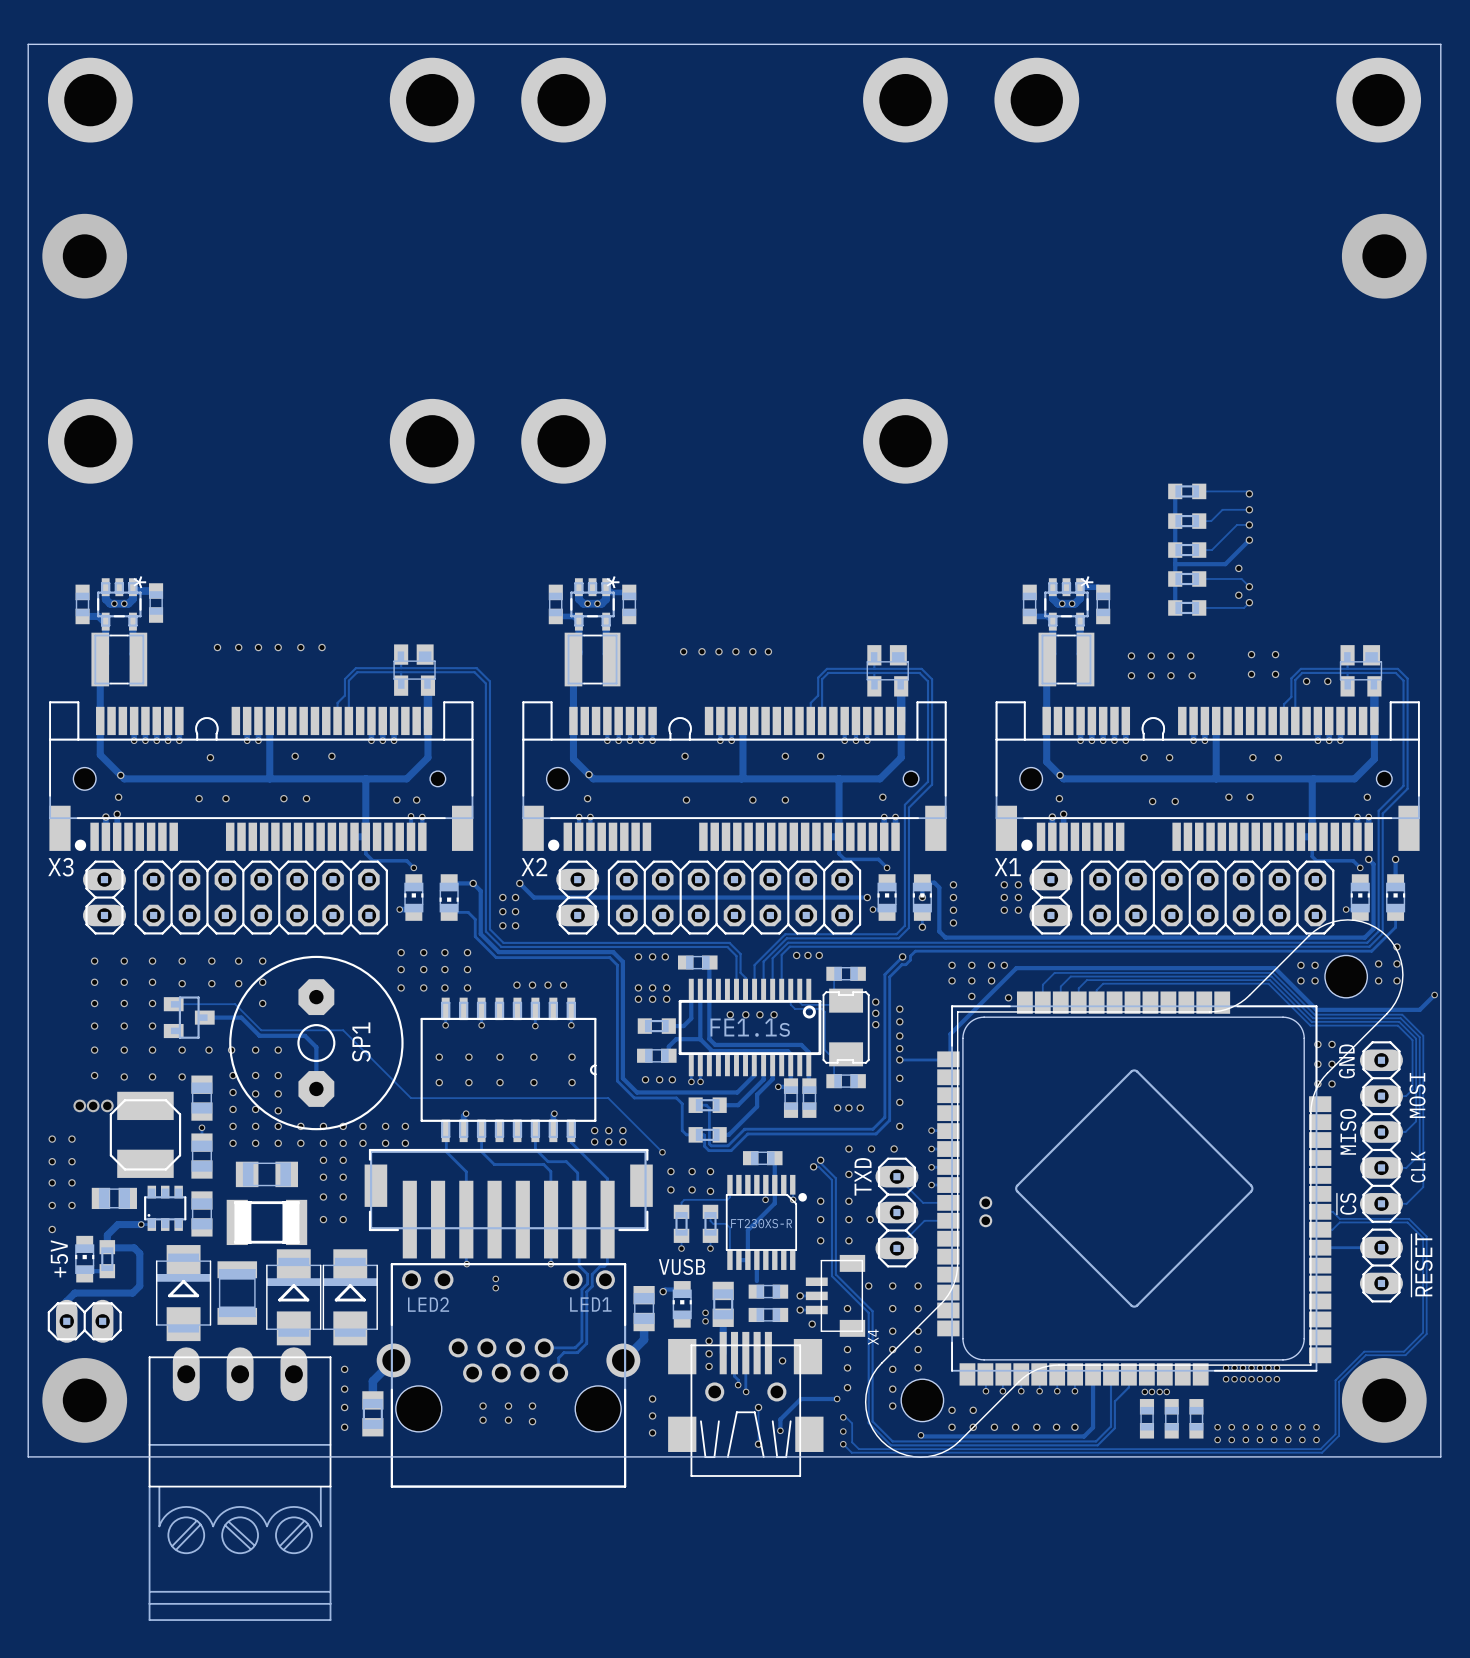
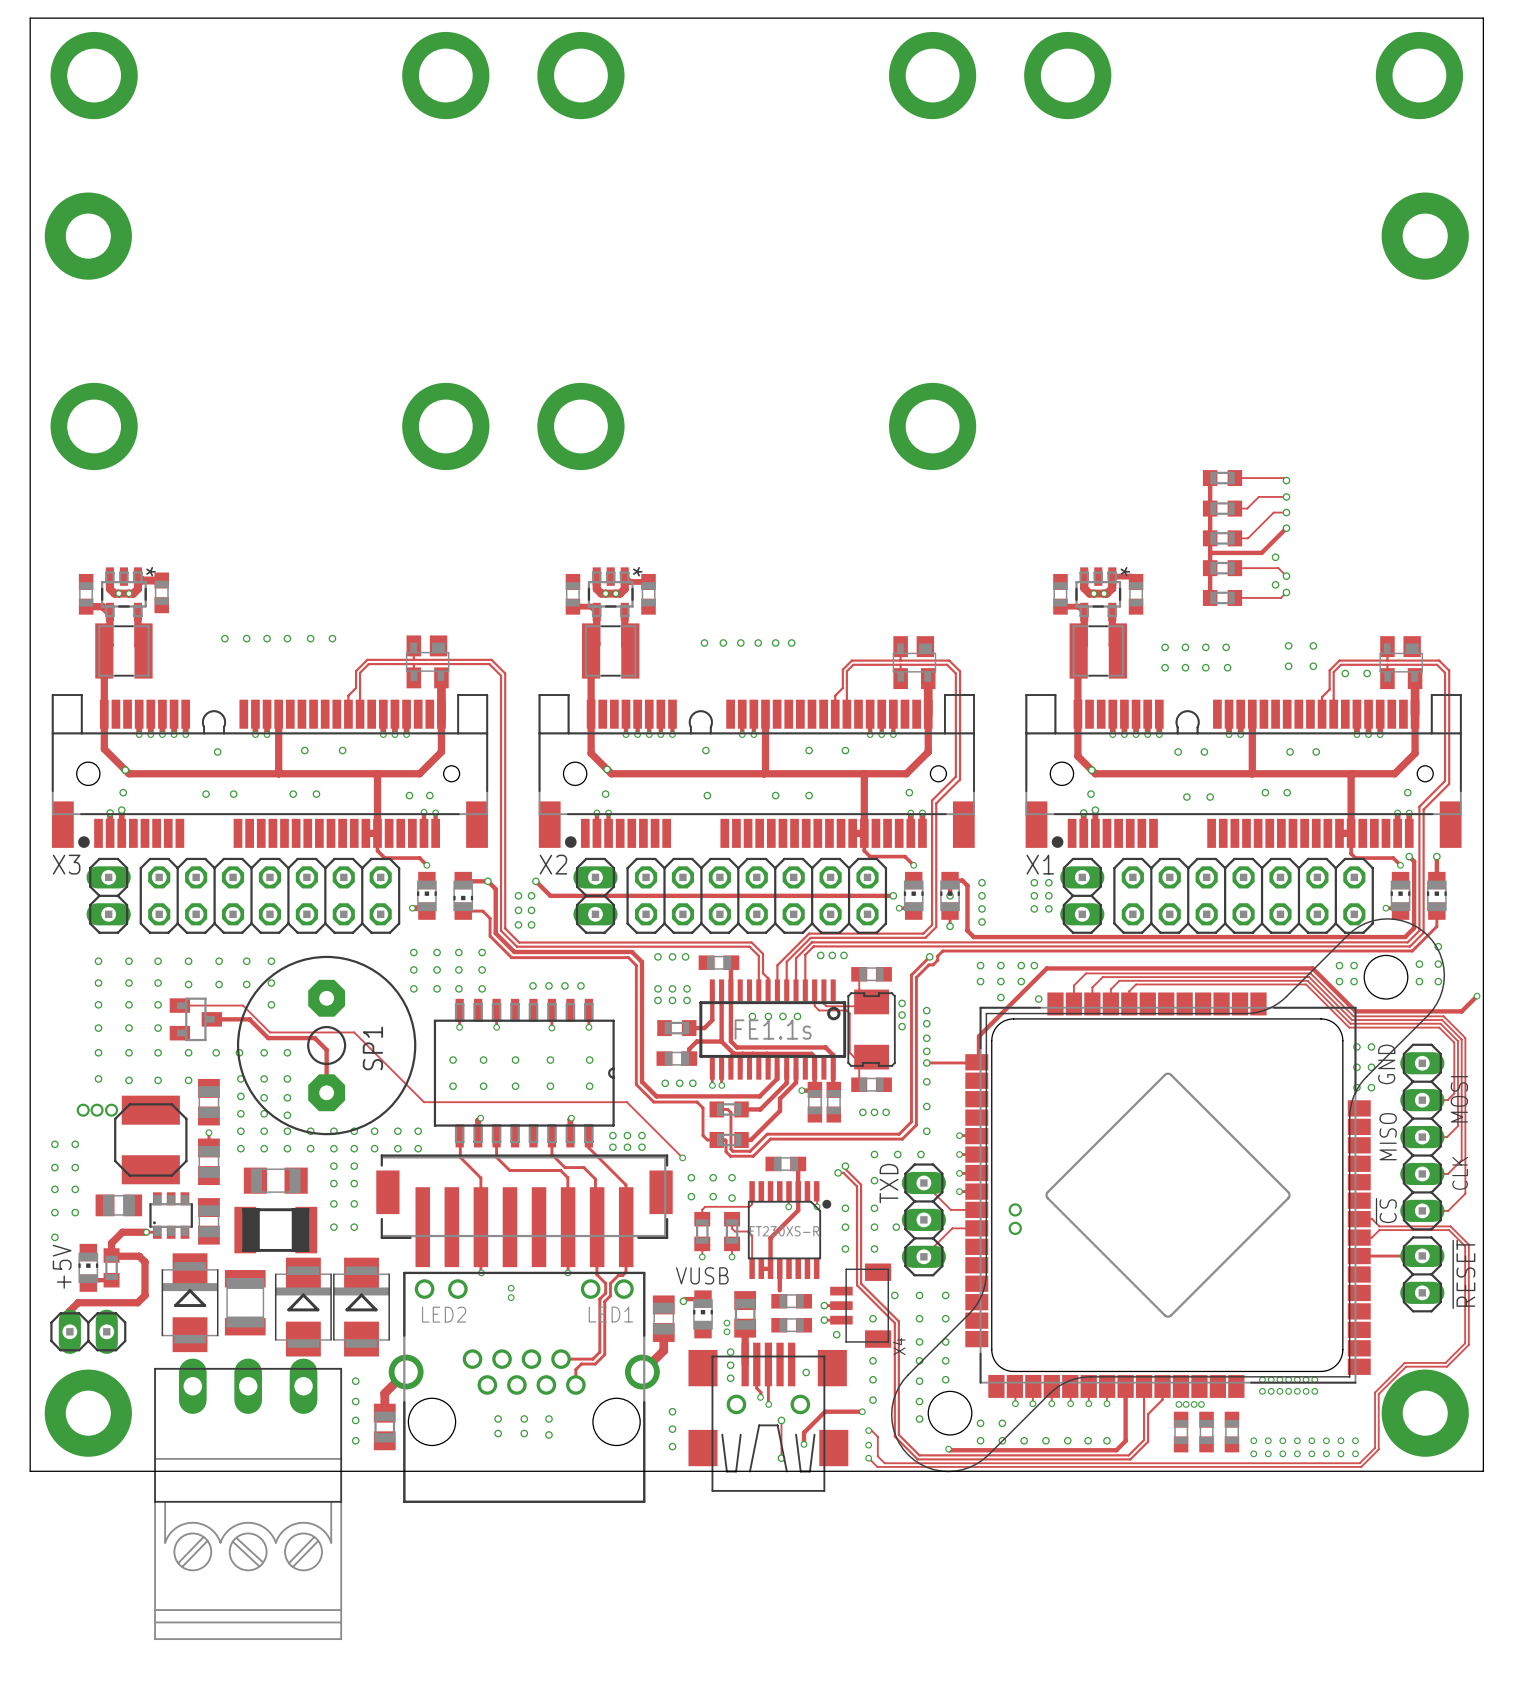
part footprint: [364, 1148, 653, 1259] -> [376, 1154, 673, 1268]

